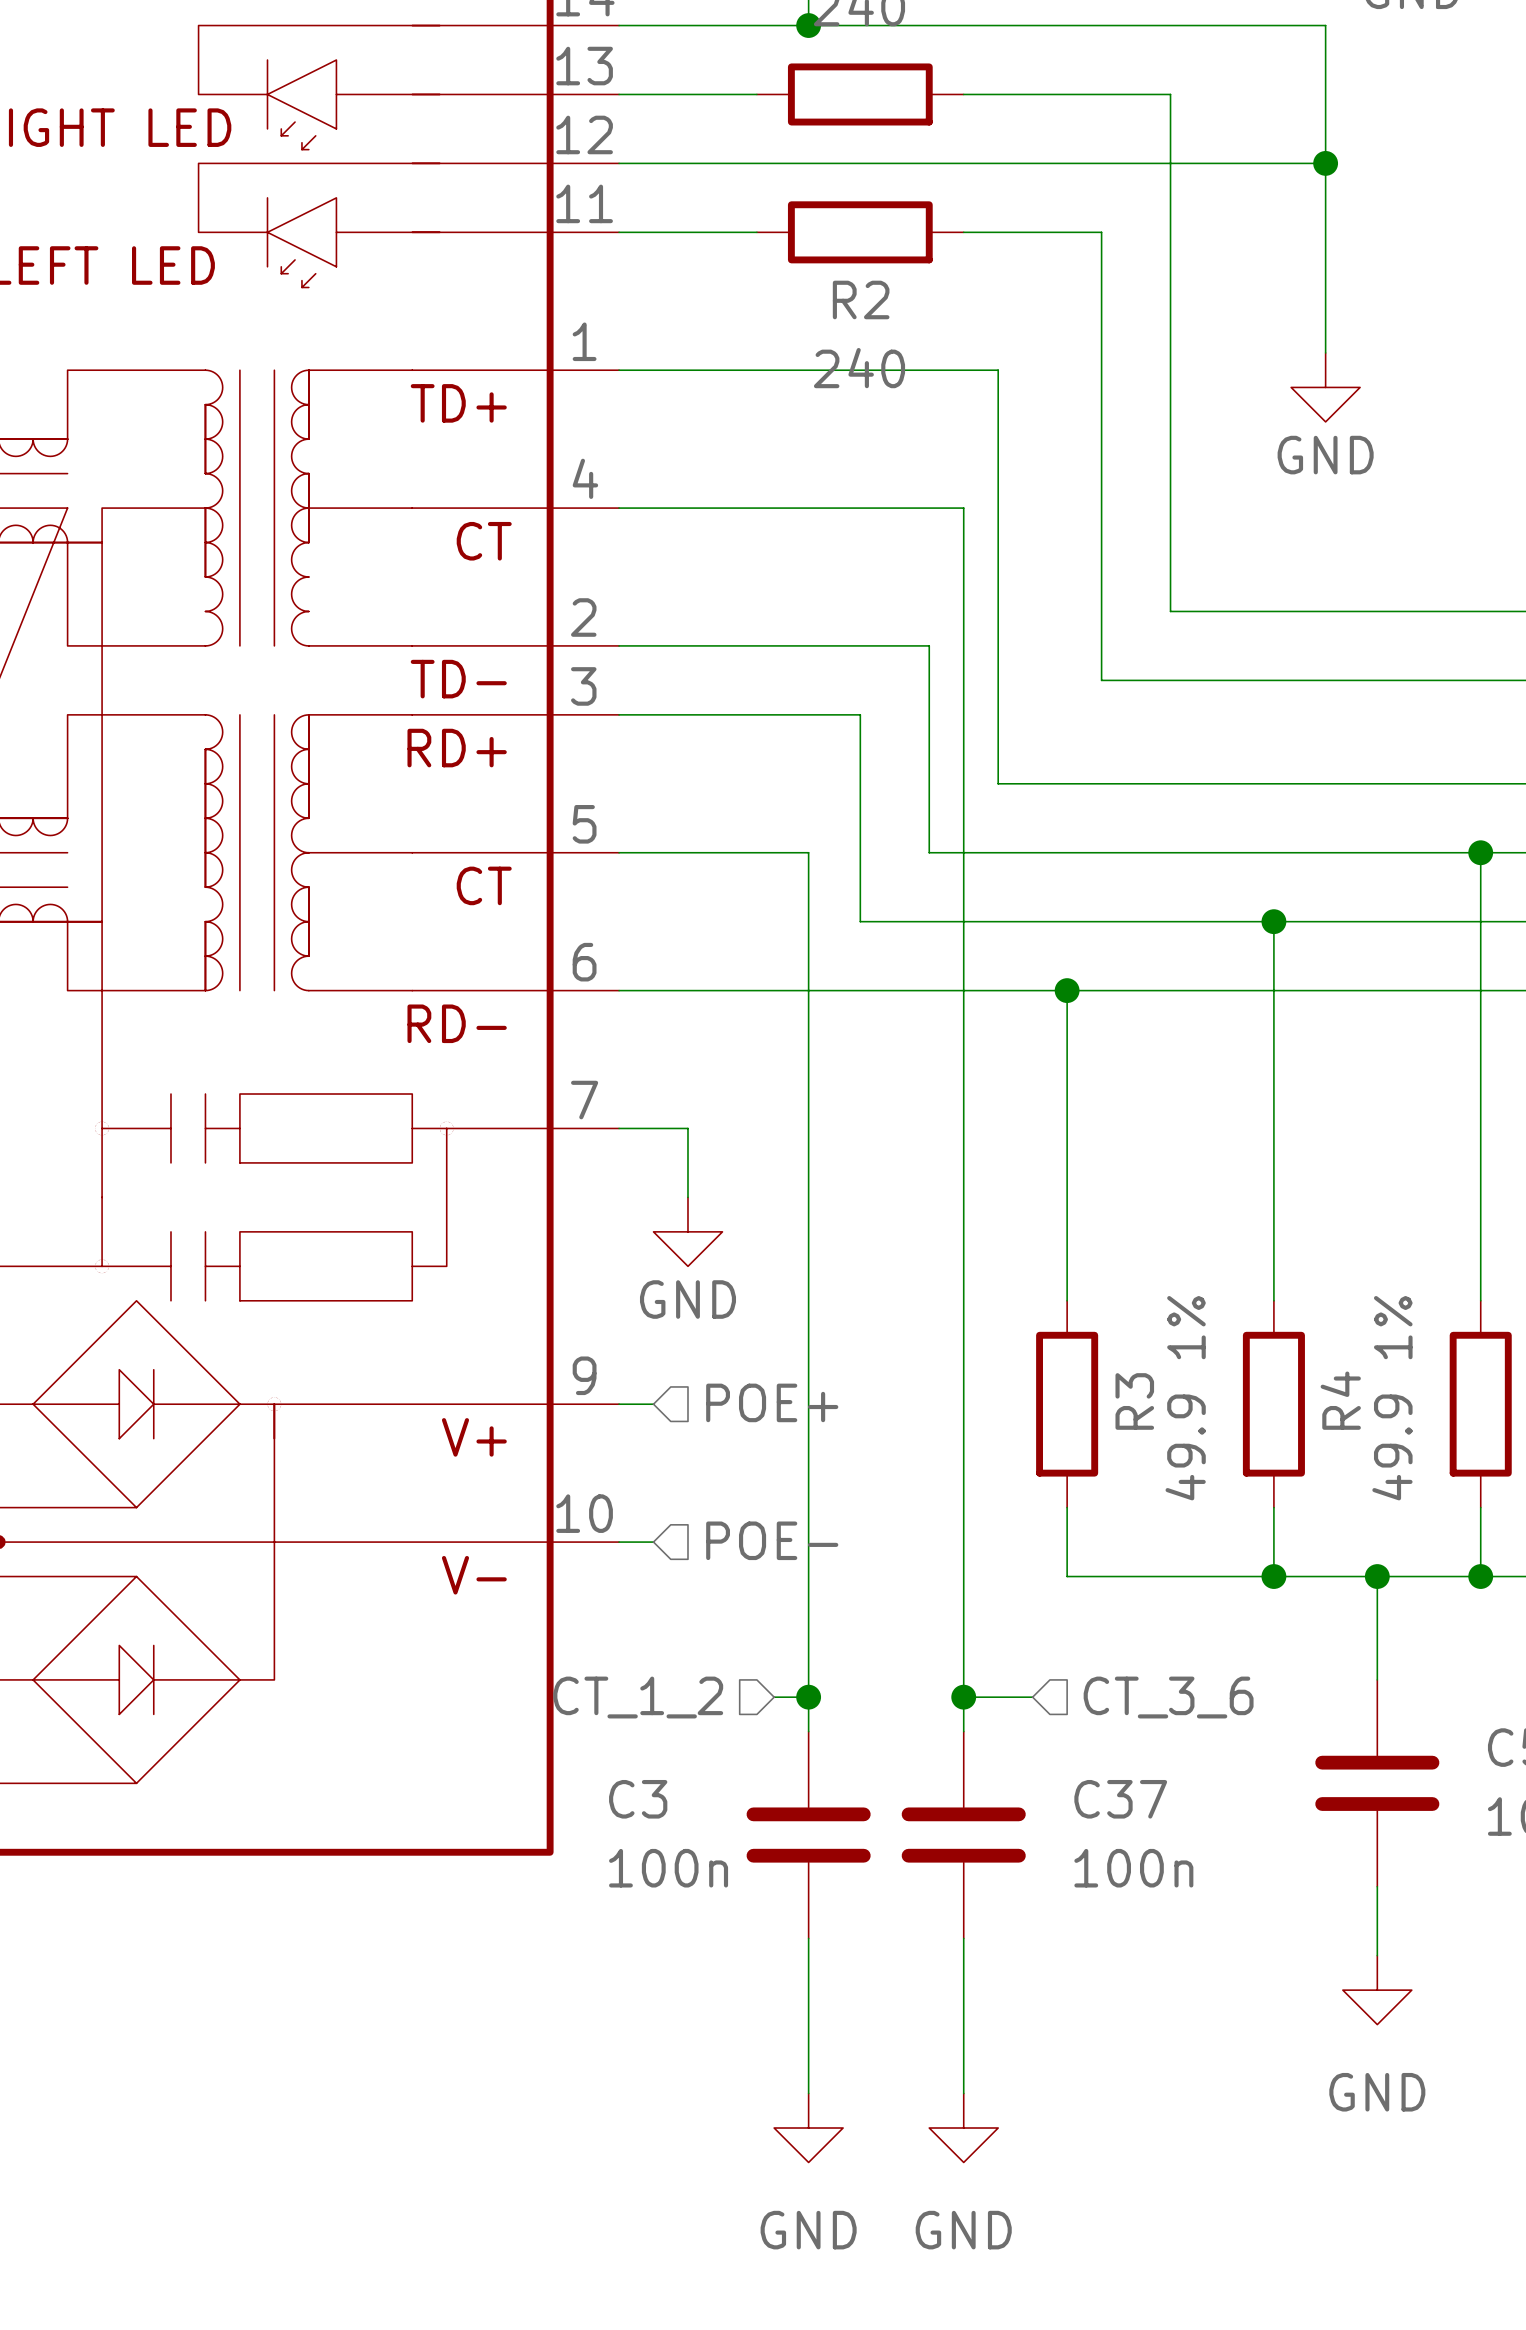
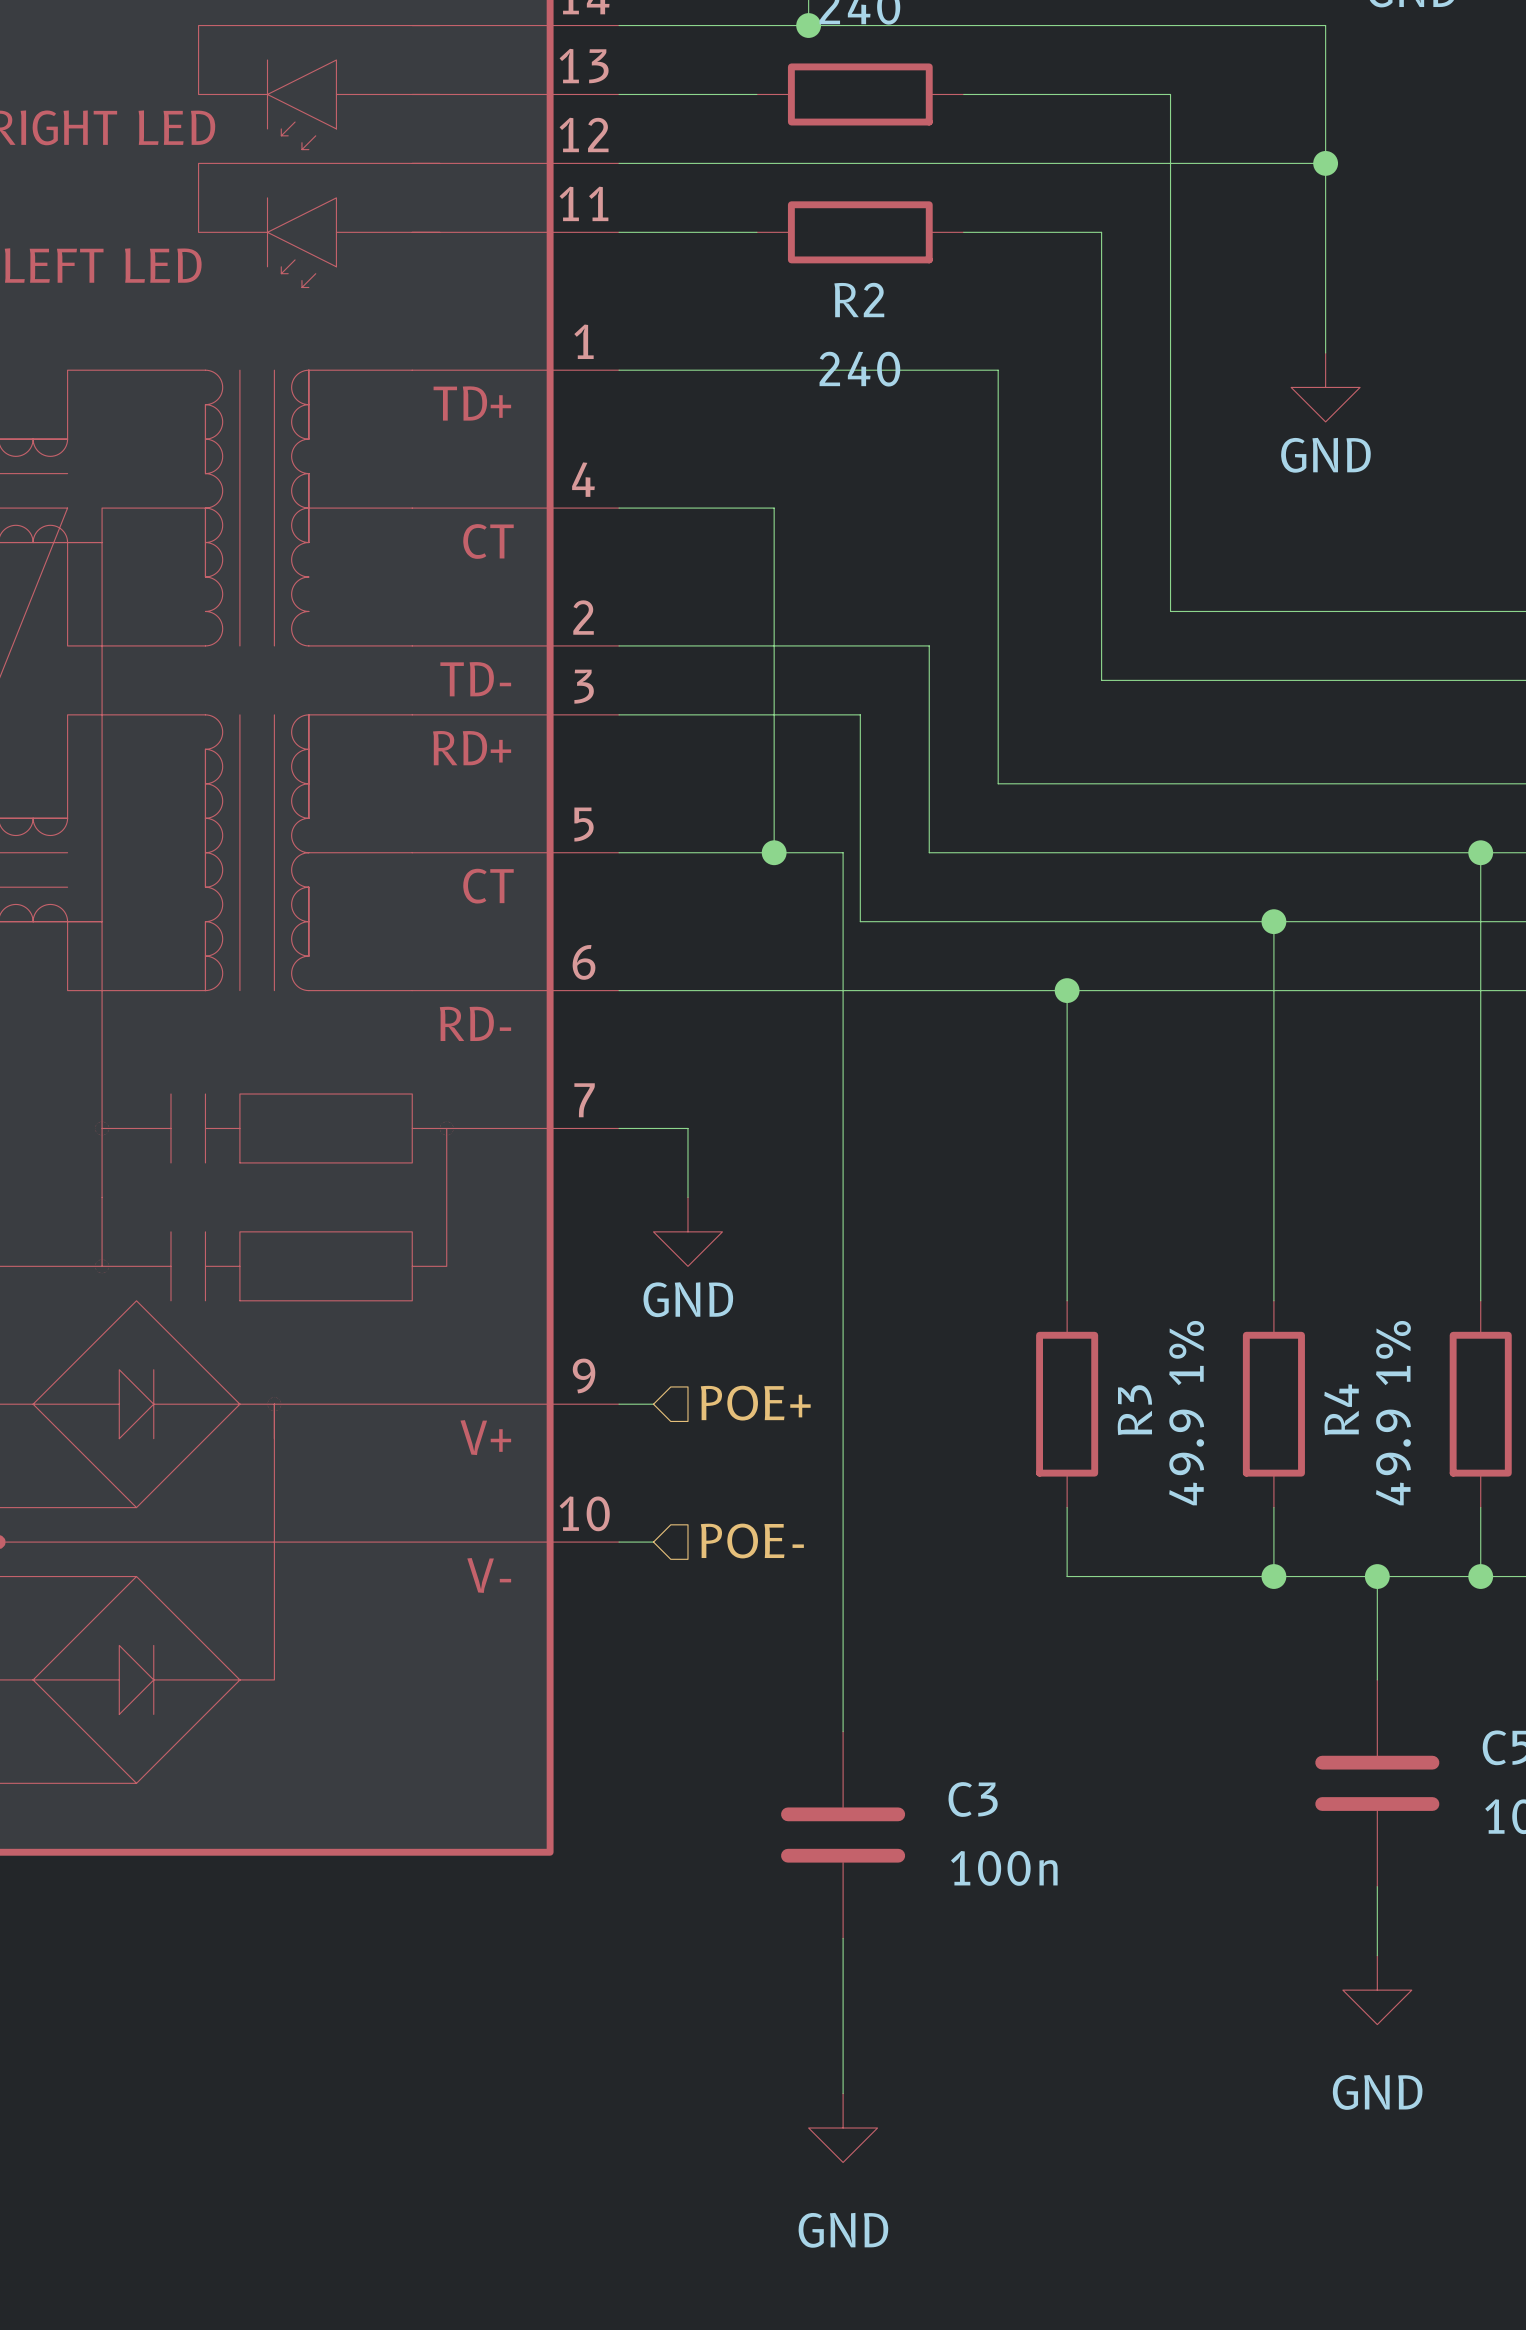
wire: (774, 508) (963, 508) (963, 1697) -> (774, 508) (774, 852)
junction: none -> (774, 852)
wire: (808, 852) (808, 1731) -> (808, 852) (843, 852) (843, 1731)
hierarchical label: CT_1_2 (638, 1697) -> none
wire: (774, 1697) (808, 1697) -> none
junction: (808, 1697) -> none
wire: (963, 1697) (963, 1731) -> none
wire: (963, 1697) (1032, 1697) -> none
junction: (963, 1697) -> none
hierarchical label: CT_3_6 (1168, 1697) -> none
C3 name position: C3 (638, 1799) -> C3 (973, 1799)
C3 position: (808, 1835) -> (843, 1835)
C37: 100n (963, 1835) -> none
C3 value position: 100n (668, 1868) -> 100n (1004, 1868)
wire: (808, 1938) (808, 2093) -> (843, 1938) (843, 2093)
wire: (963, 1938) (963, 2093) -> none
power symbol position: GND (808, 2128) -> GND (843, 2128)
power symbol: GND (963, 2128) -> none

